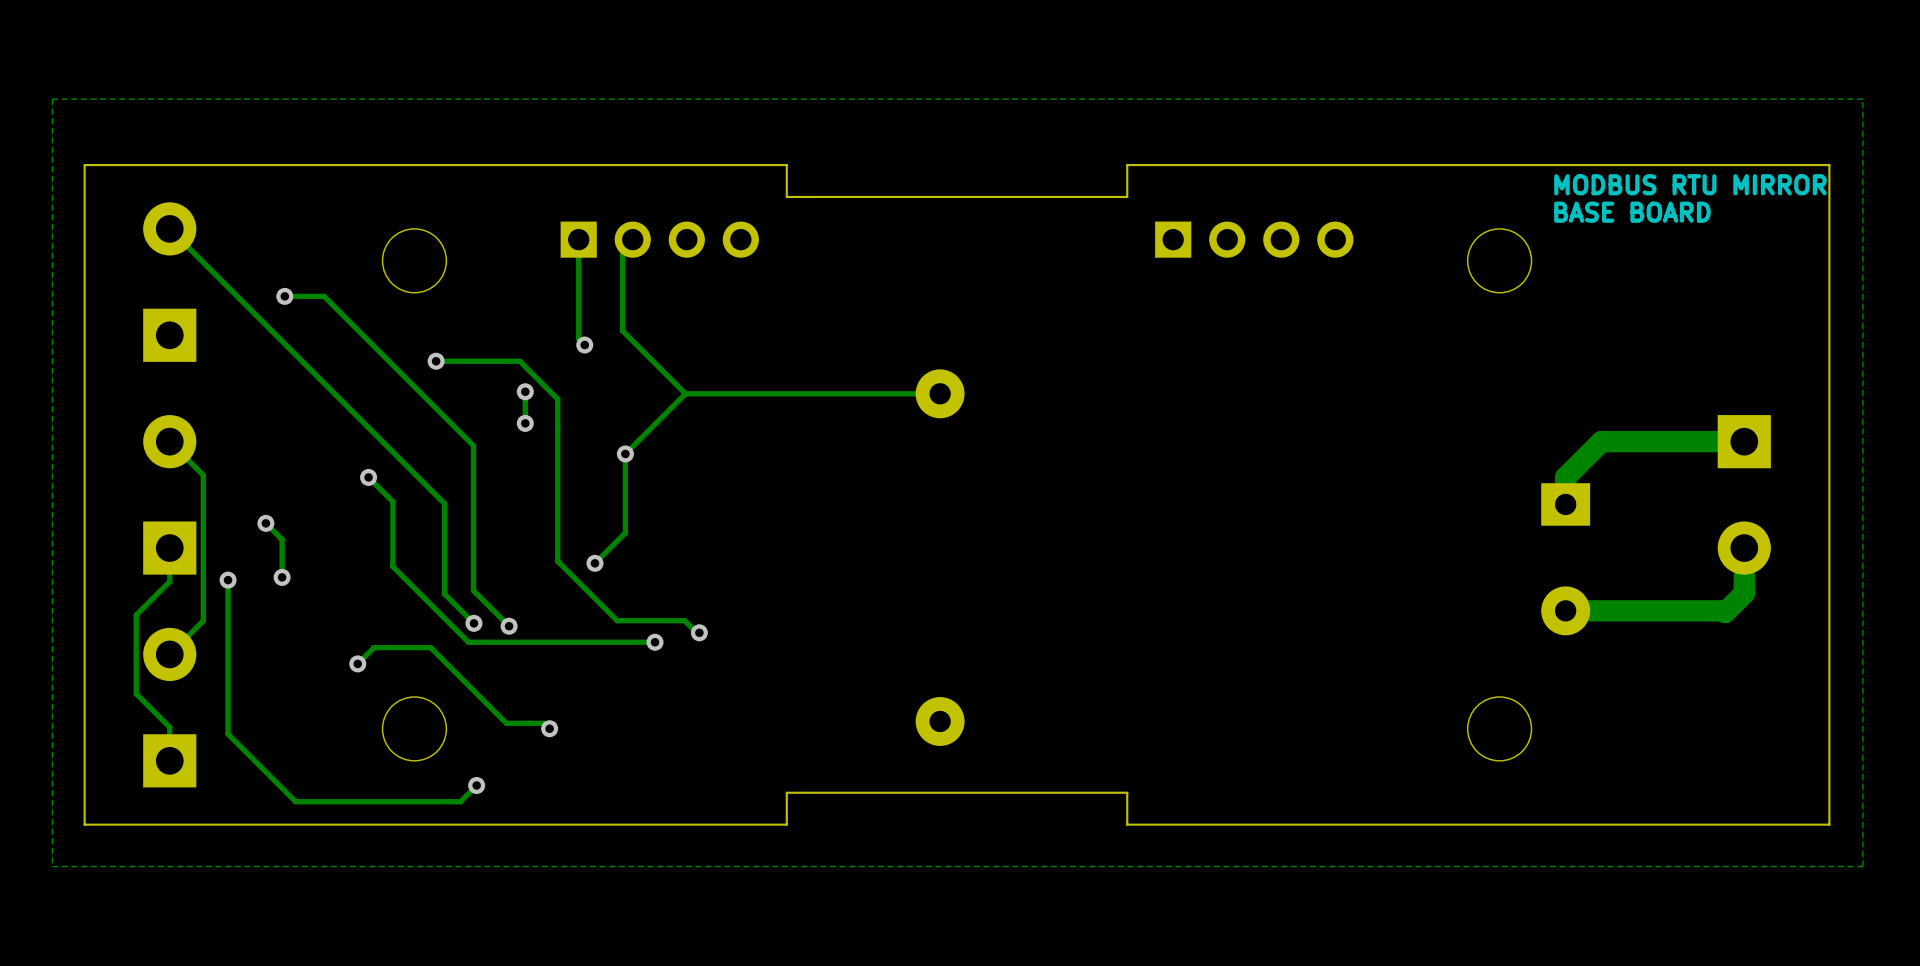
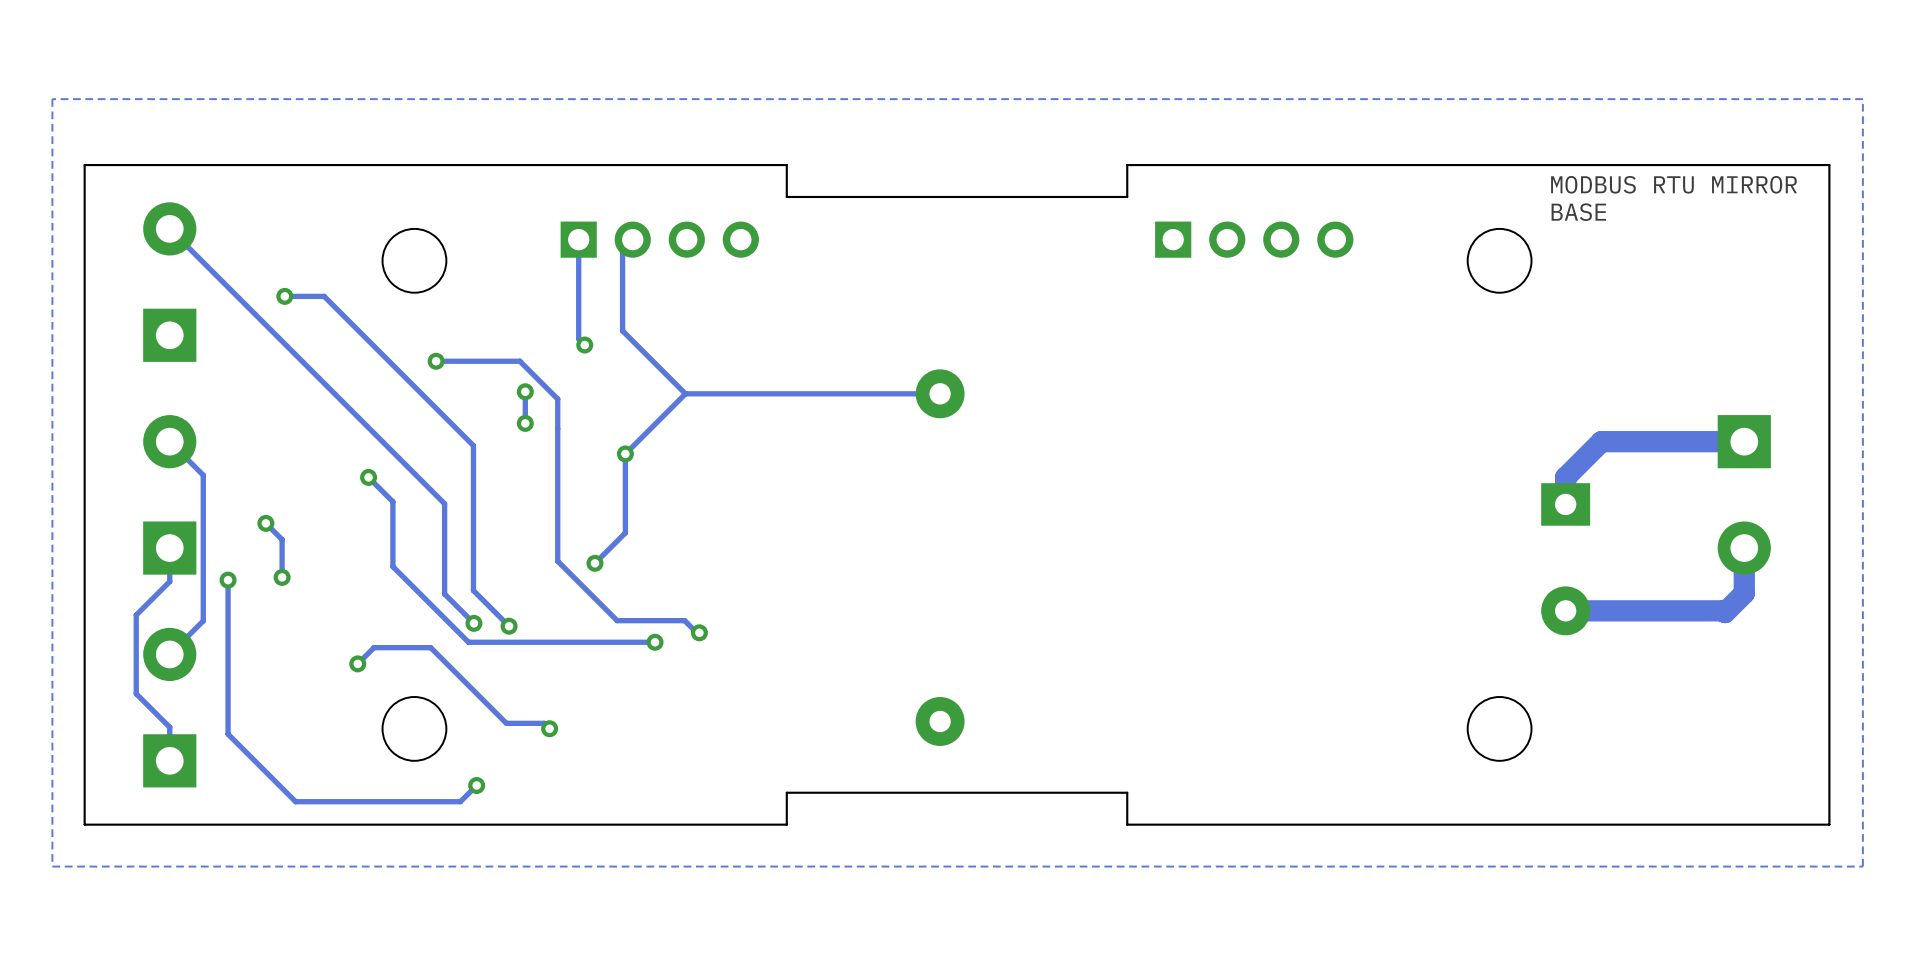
text: BASE BOARD (1632, 212) -> BASE (1578, 212)

